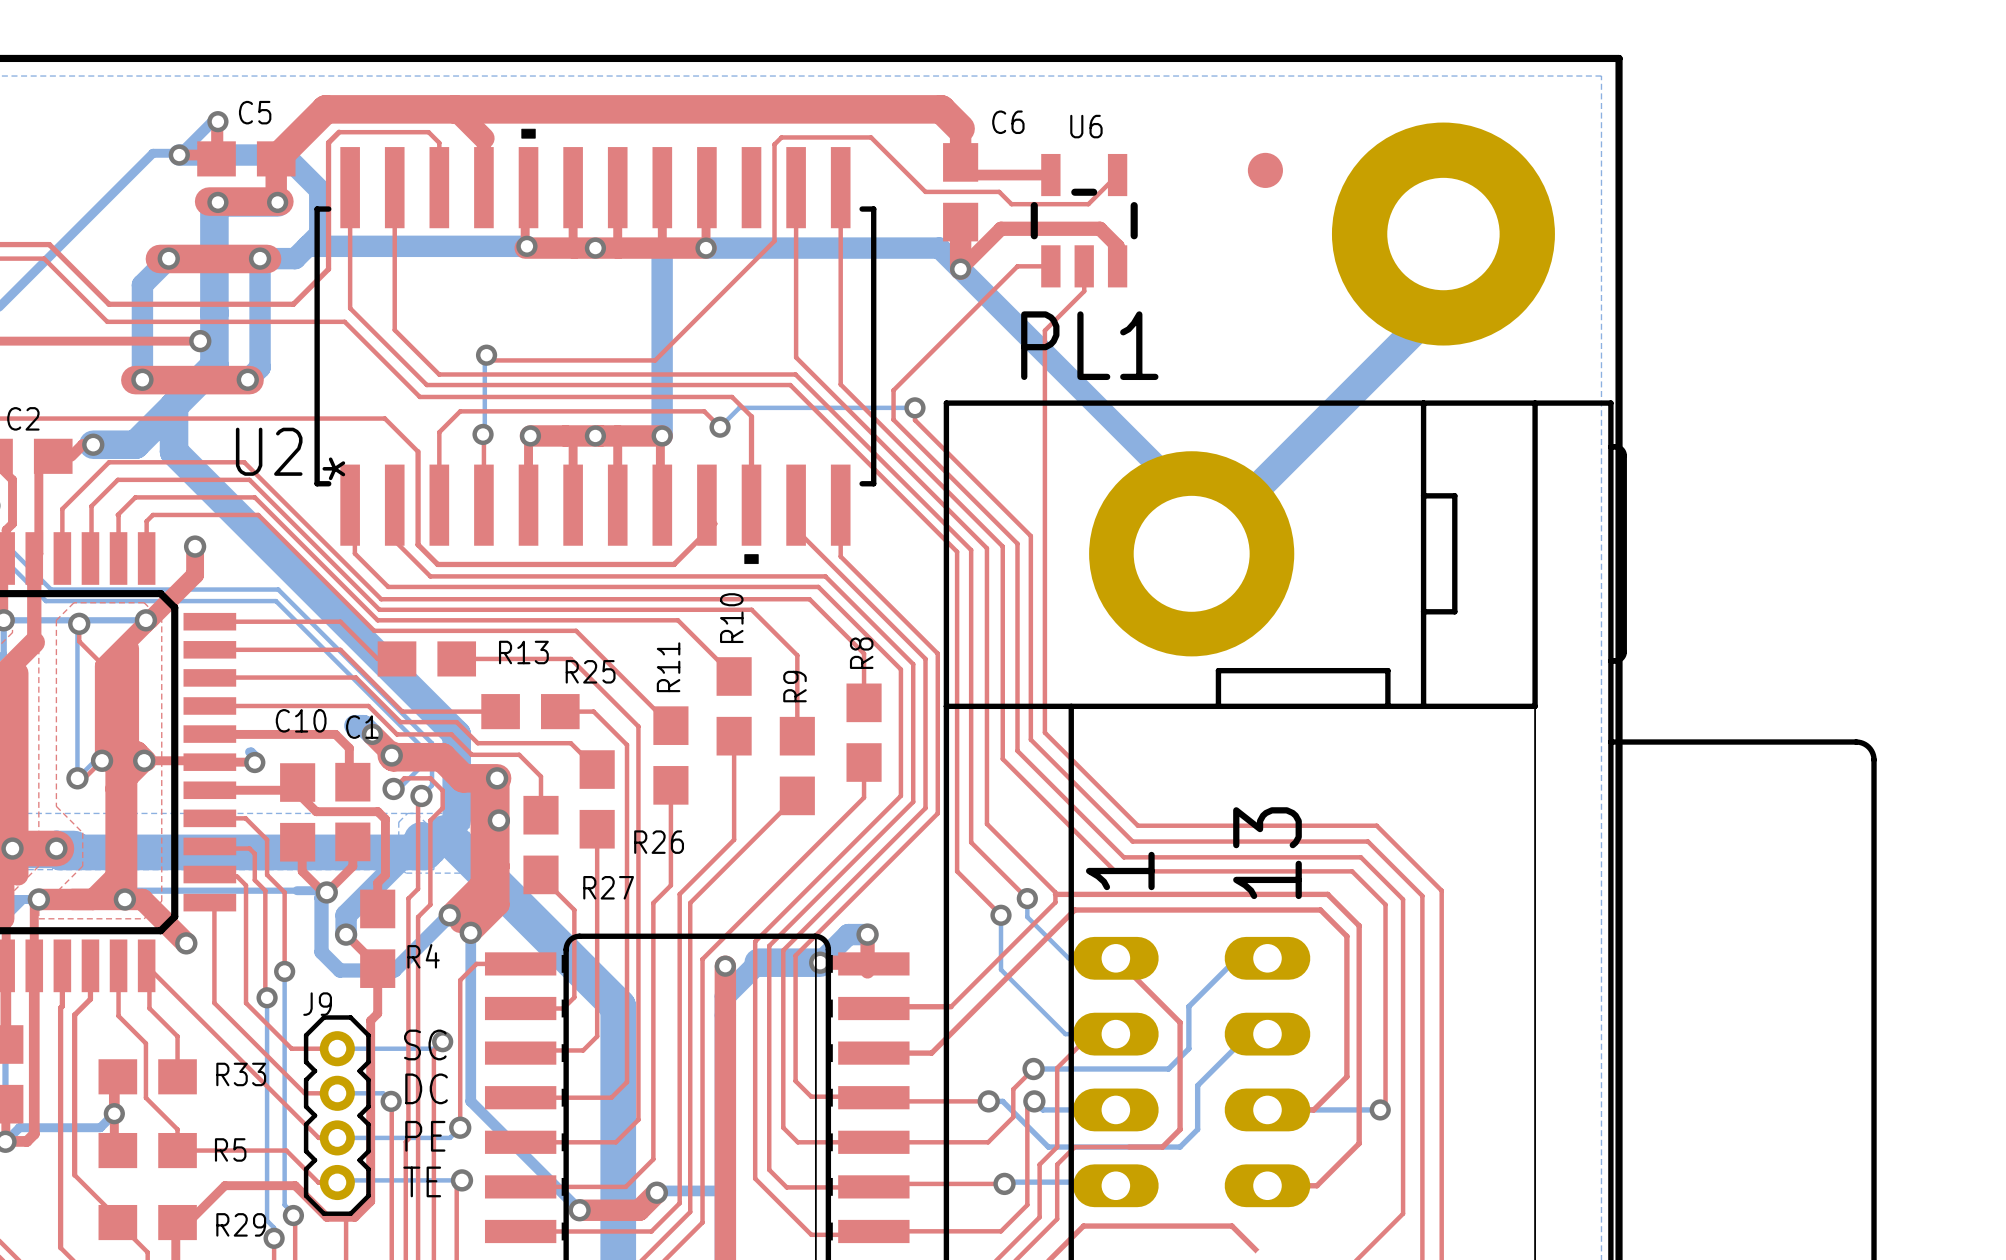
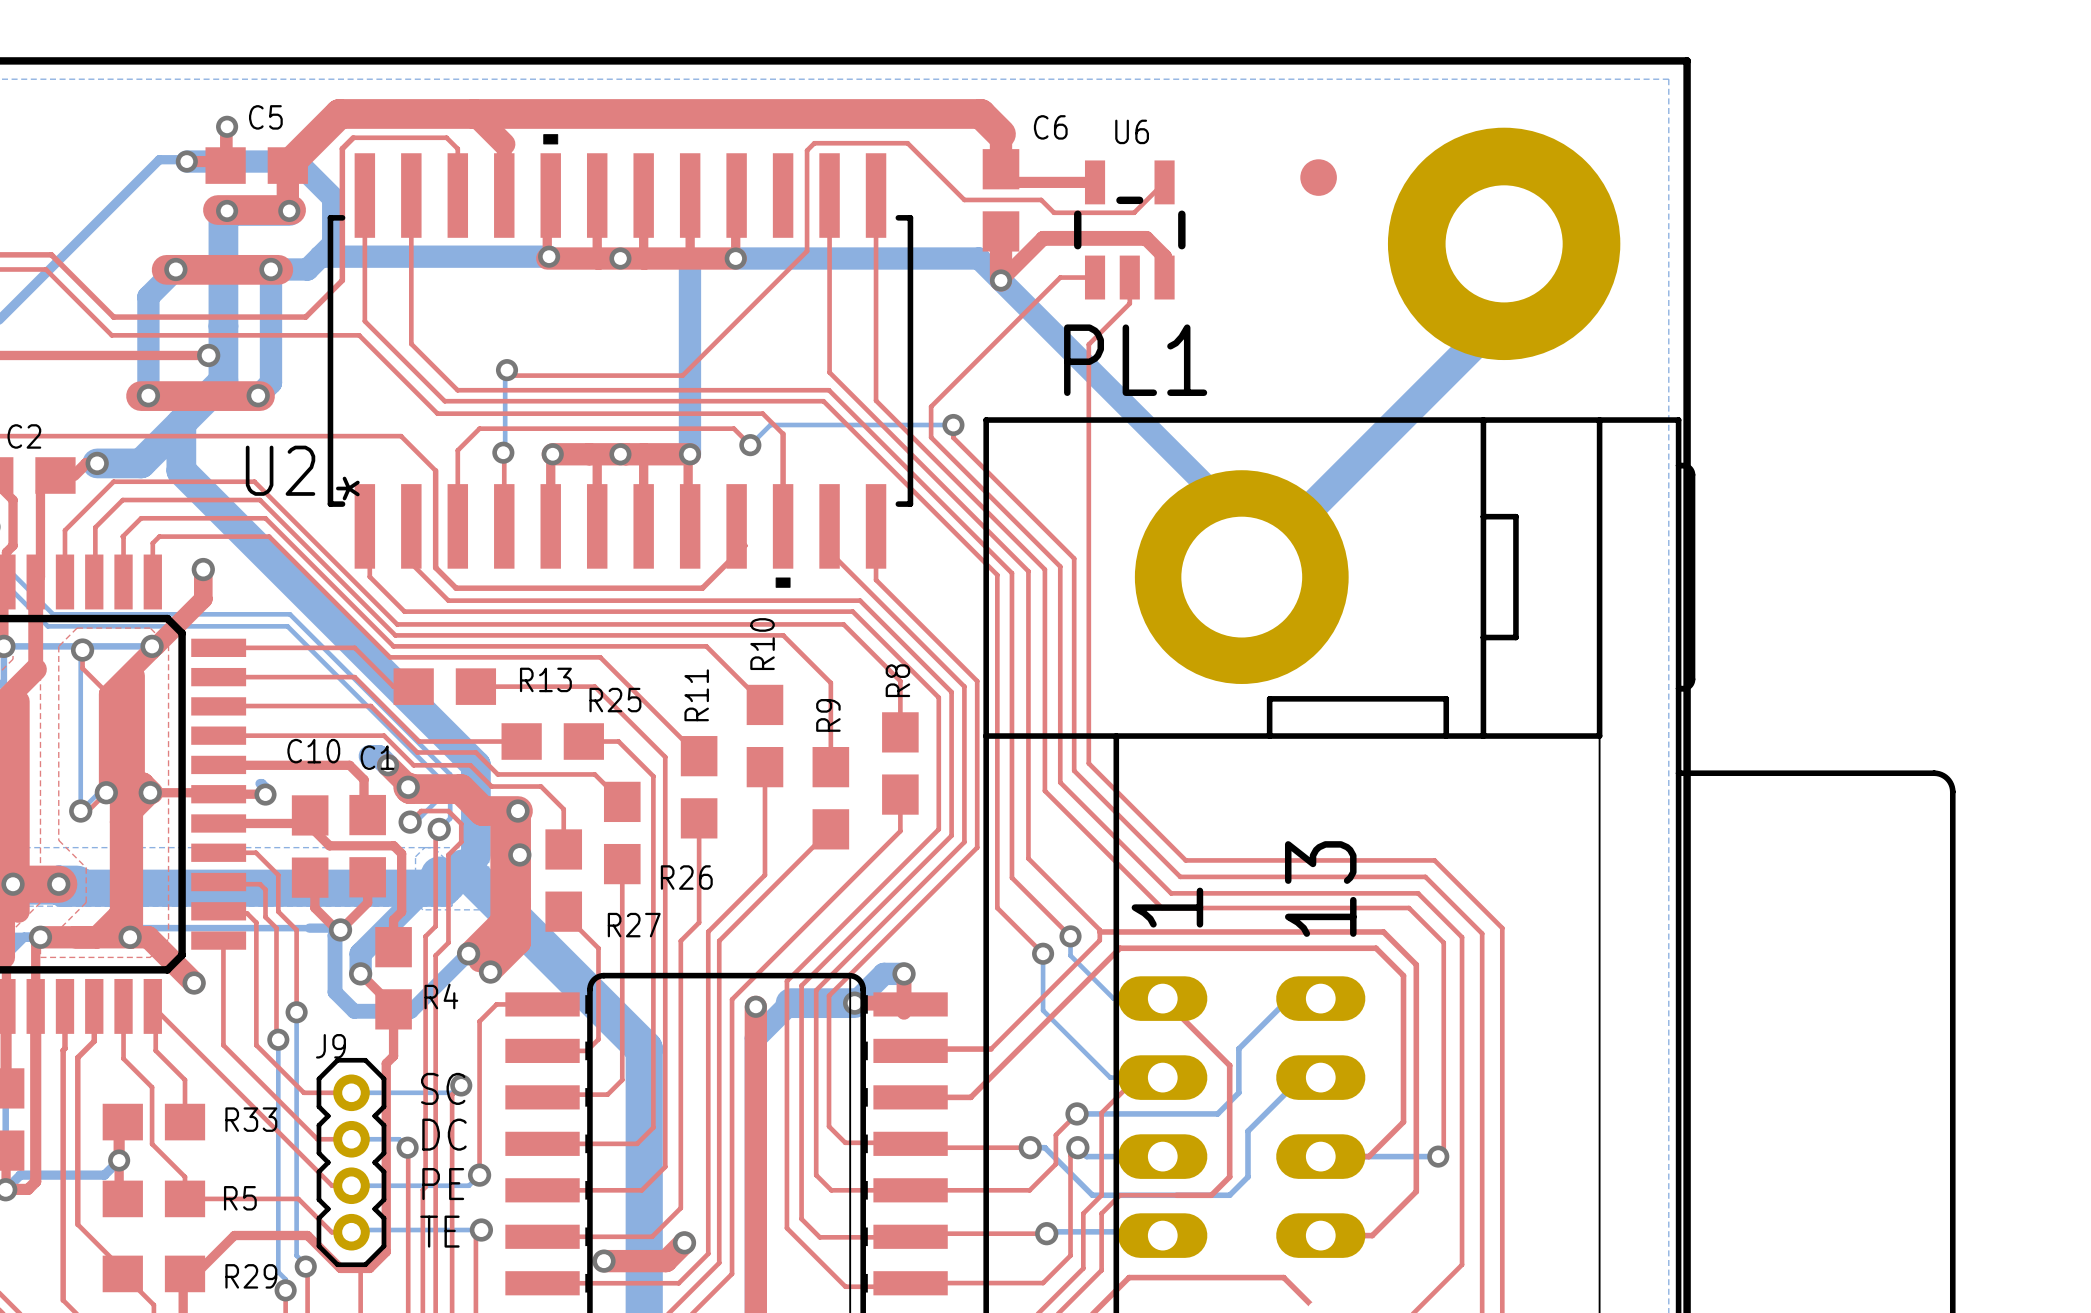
bottom track: (217, 121) (212, 121) (179, 155) -> none
bottom track: (470, 932) (470, 1101) (579, 1210) -> none
bottom track: (725, 1190) (658, 1190) (656, 1192) -> none

